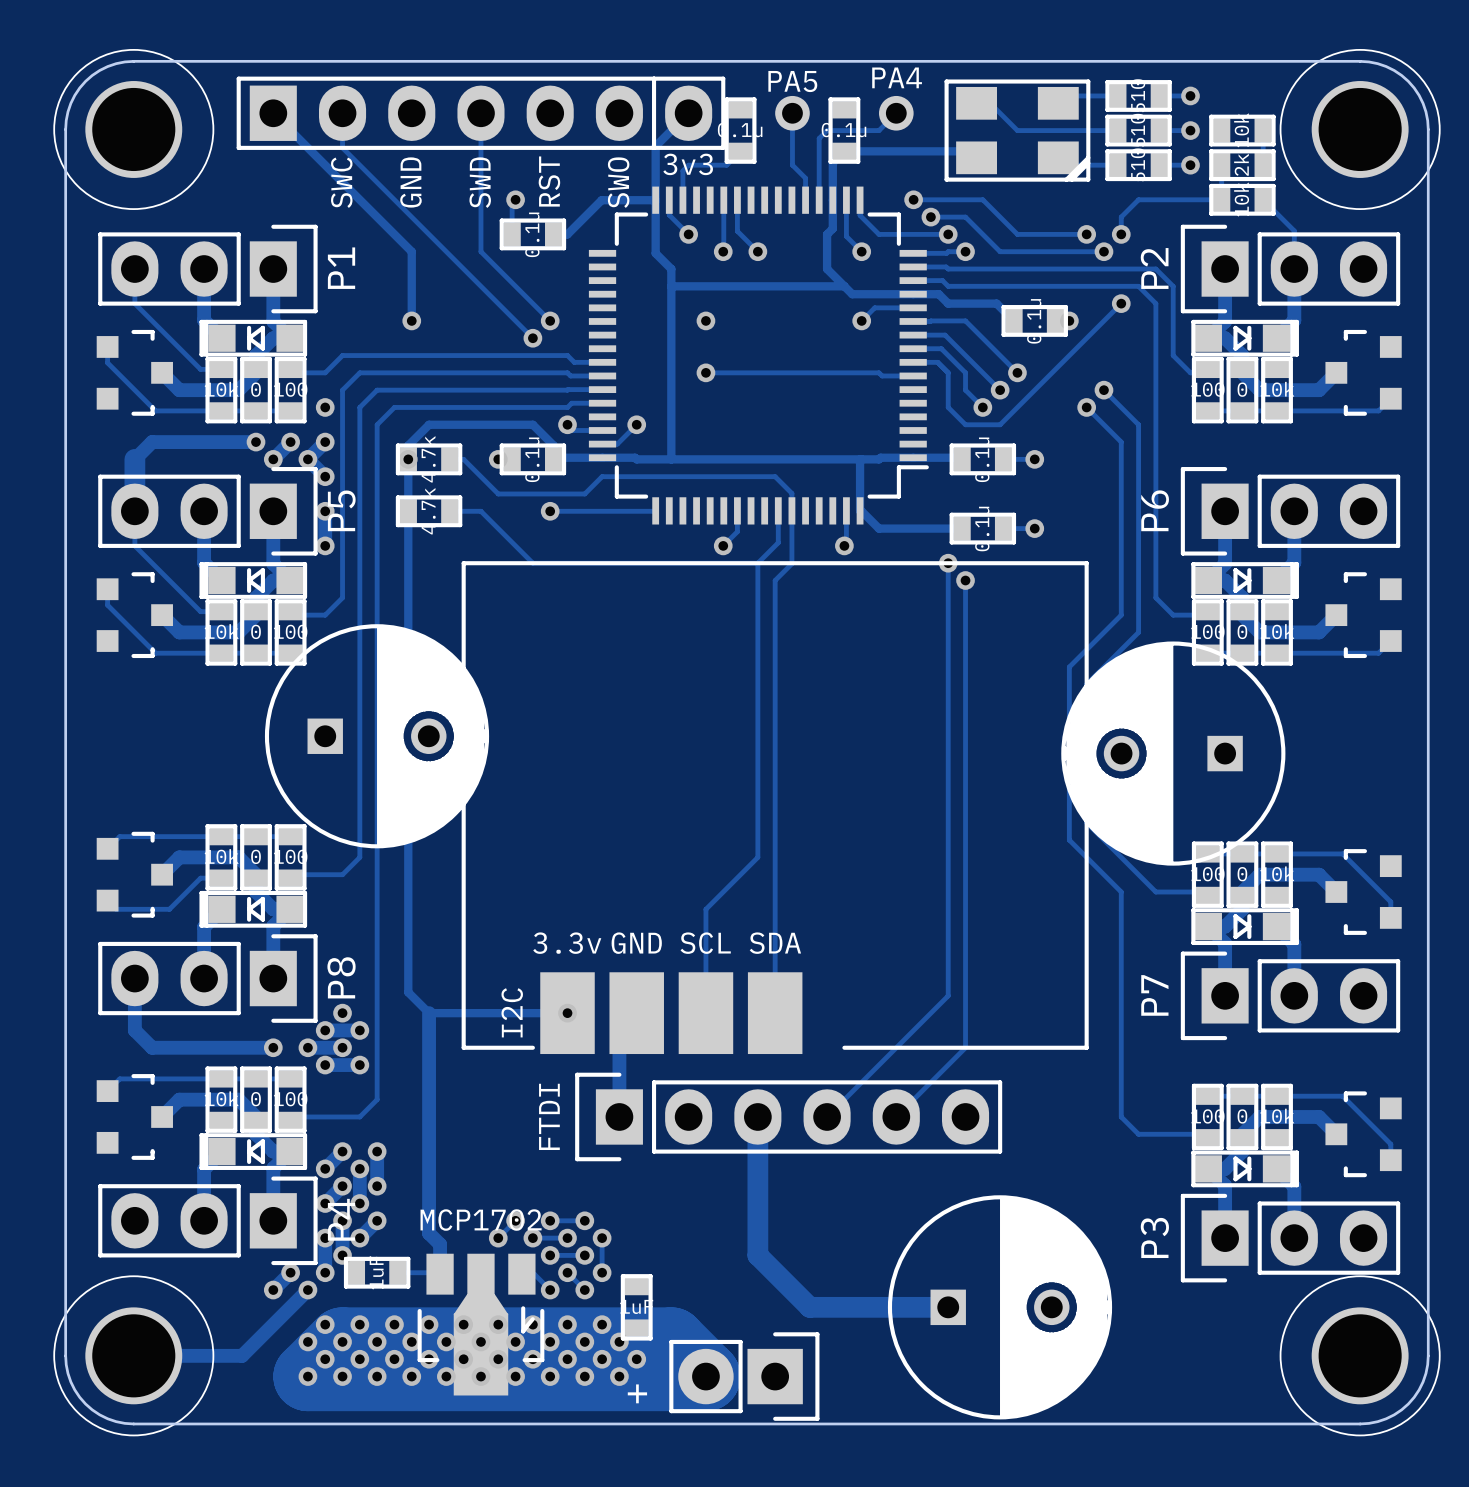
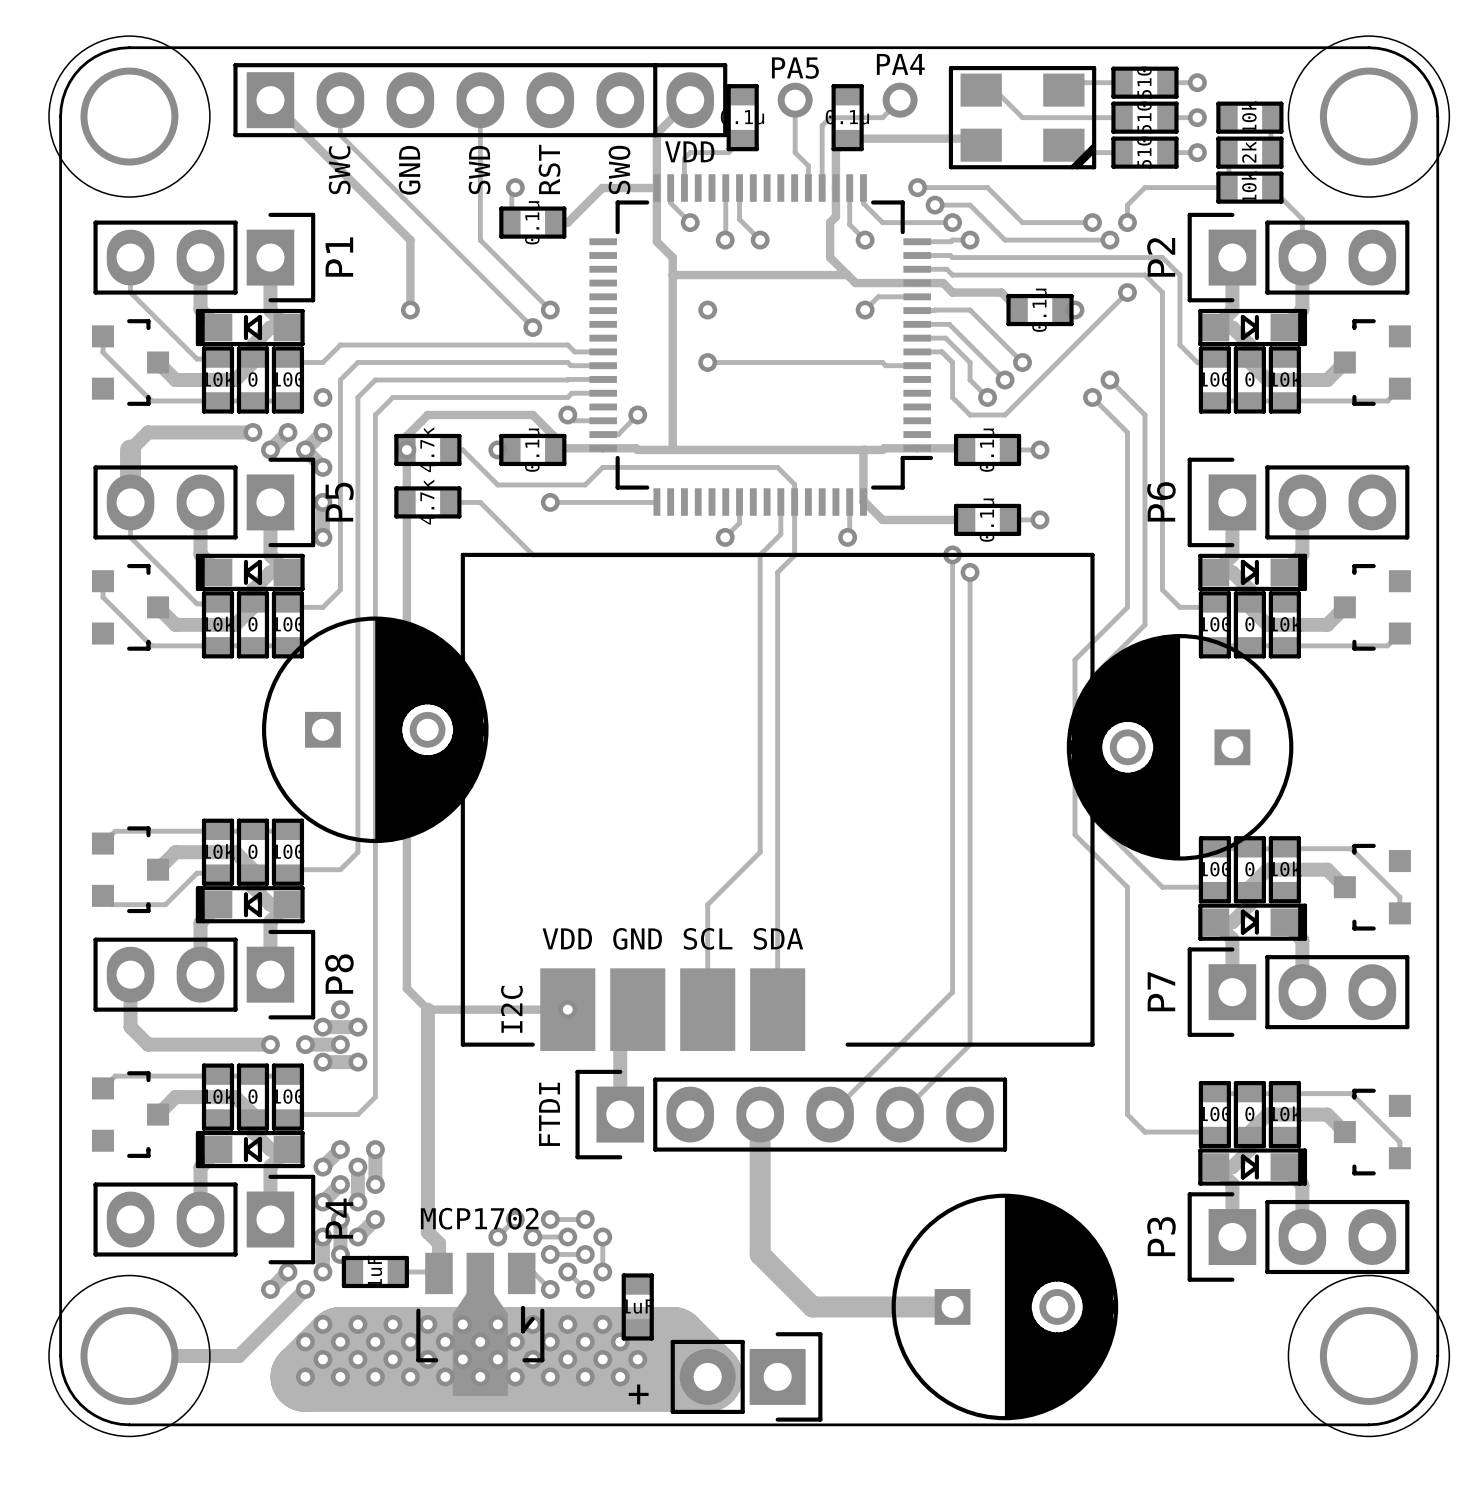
part text: 3v3 (688, 164) -> VDD (689, 151)
part text: 3.3v (567, 943) -> VDD (567, 938)

